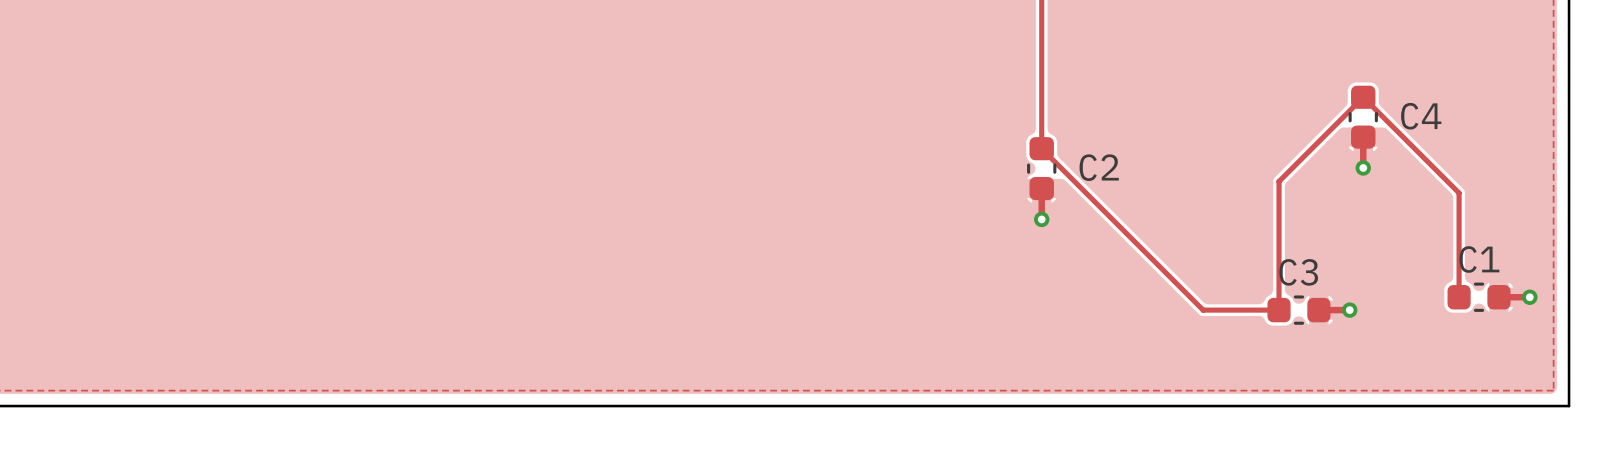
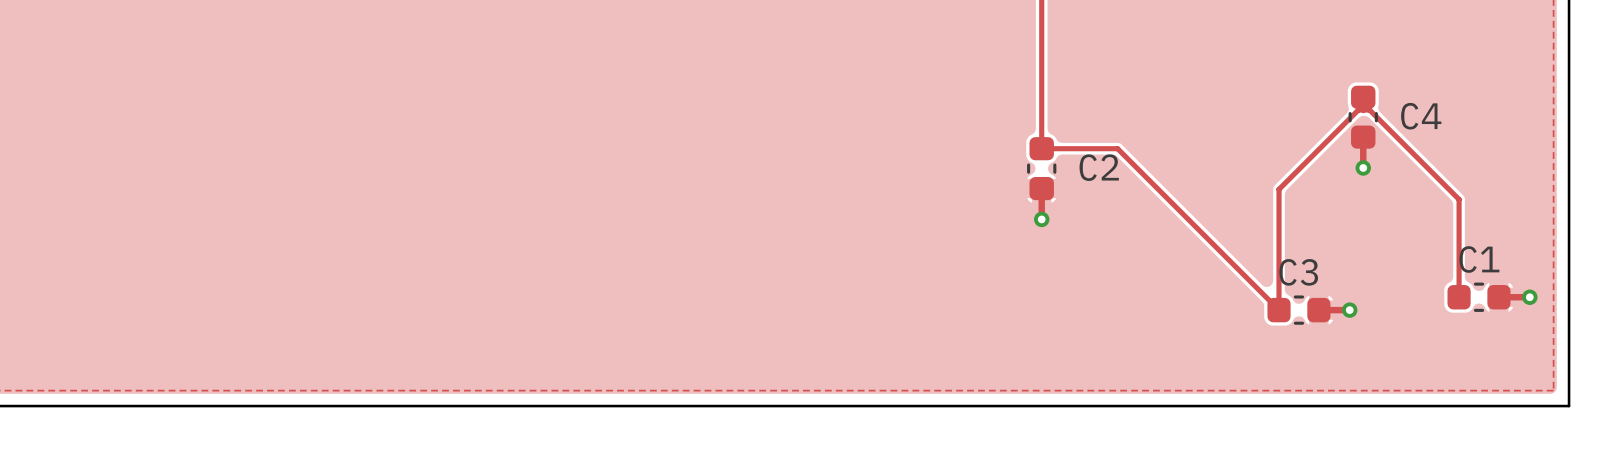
track: (1041, 148) (1203, 310) (1279, 310) -> (1041, 148) (1117, 148) (1279, 310)
track: (1279, 189) (1279, 181) (1363, 97) (1459, 193) (1459, 199) -> (1279, 189) (1358, 110) (1369, 110) (1459, 199)

